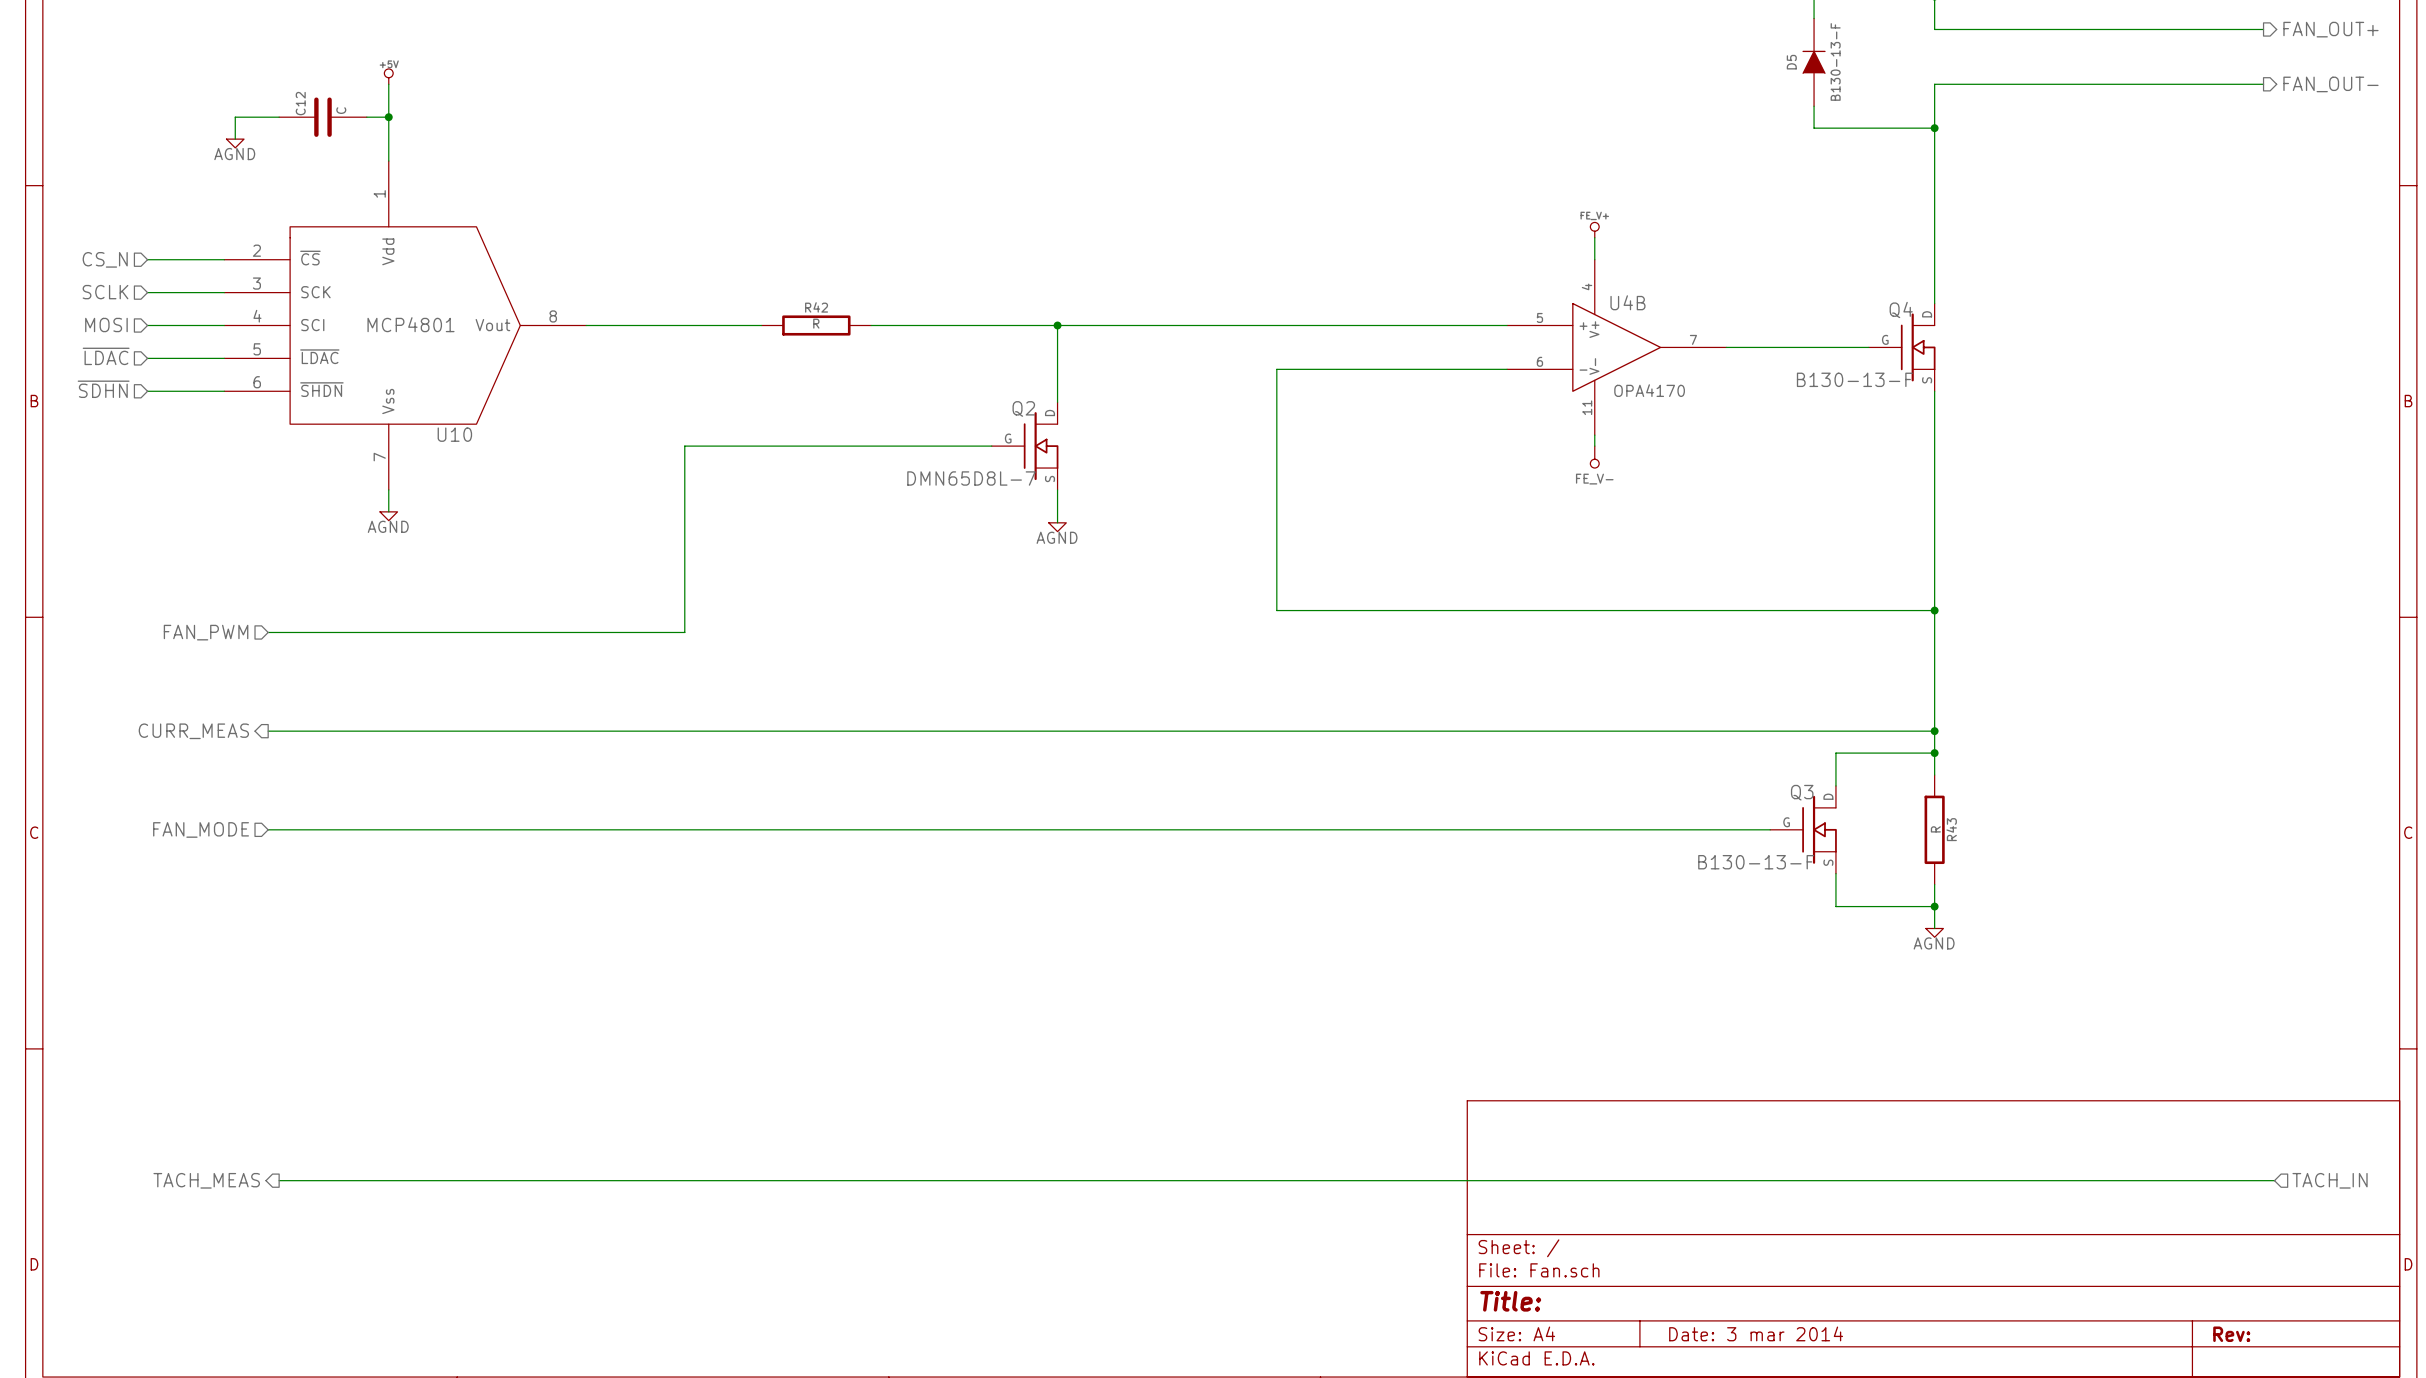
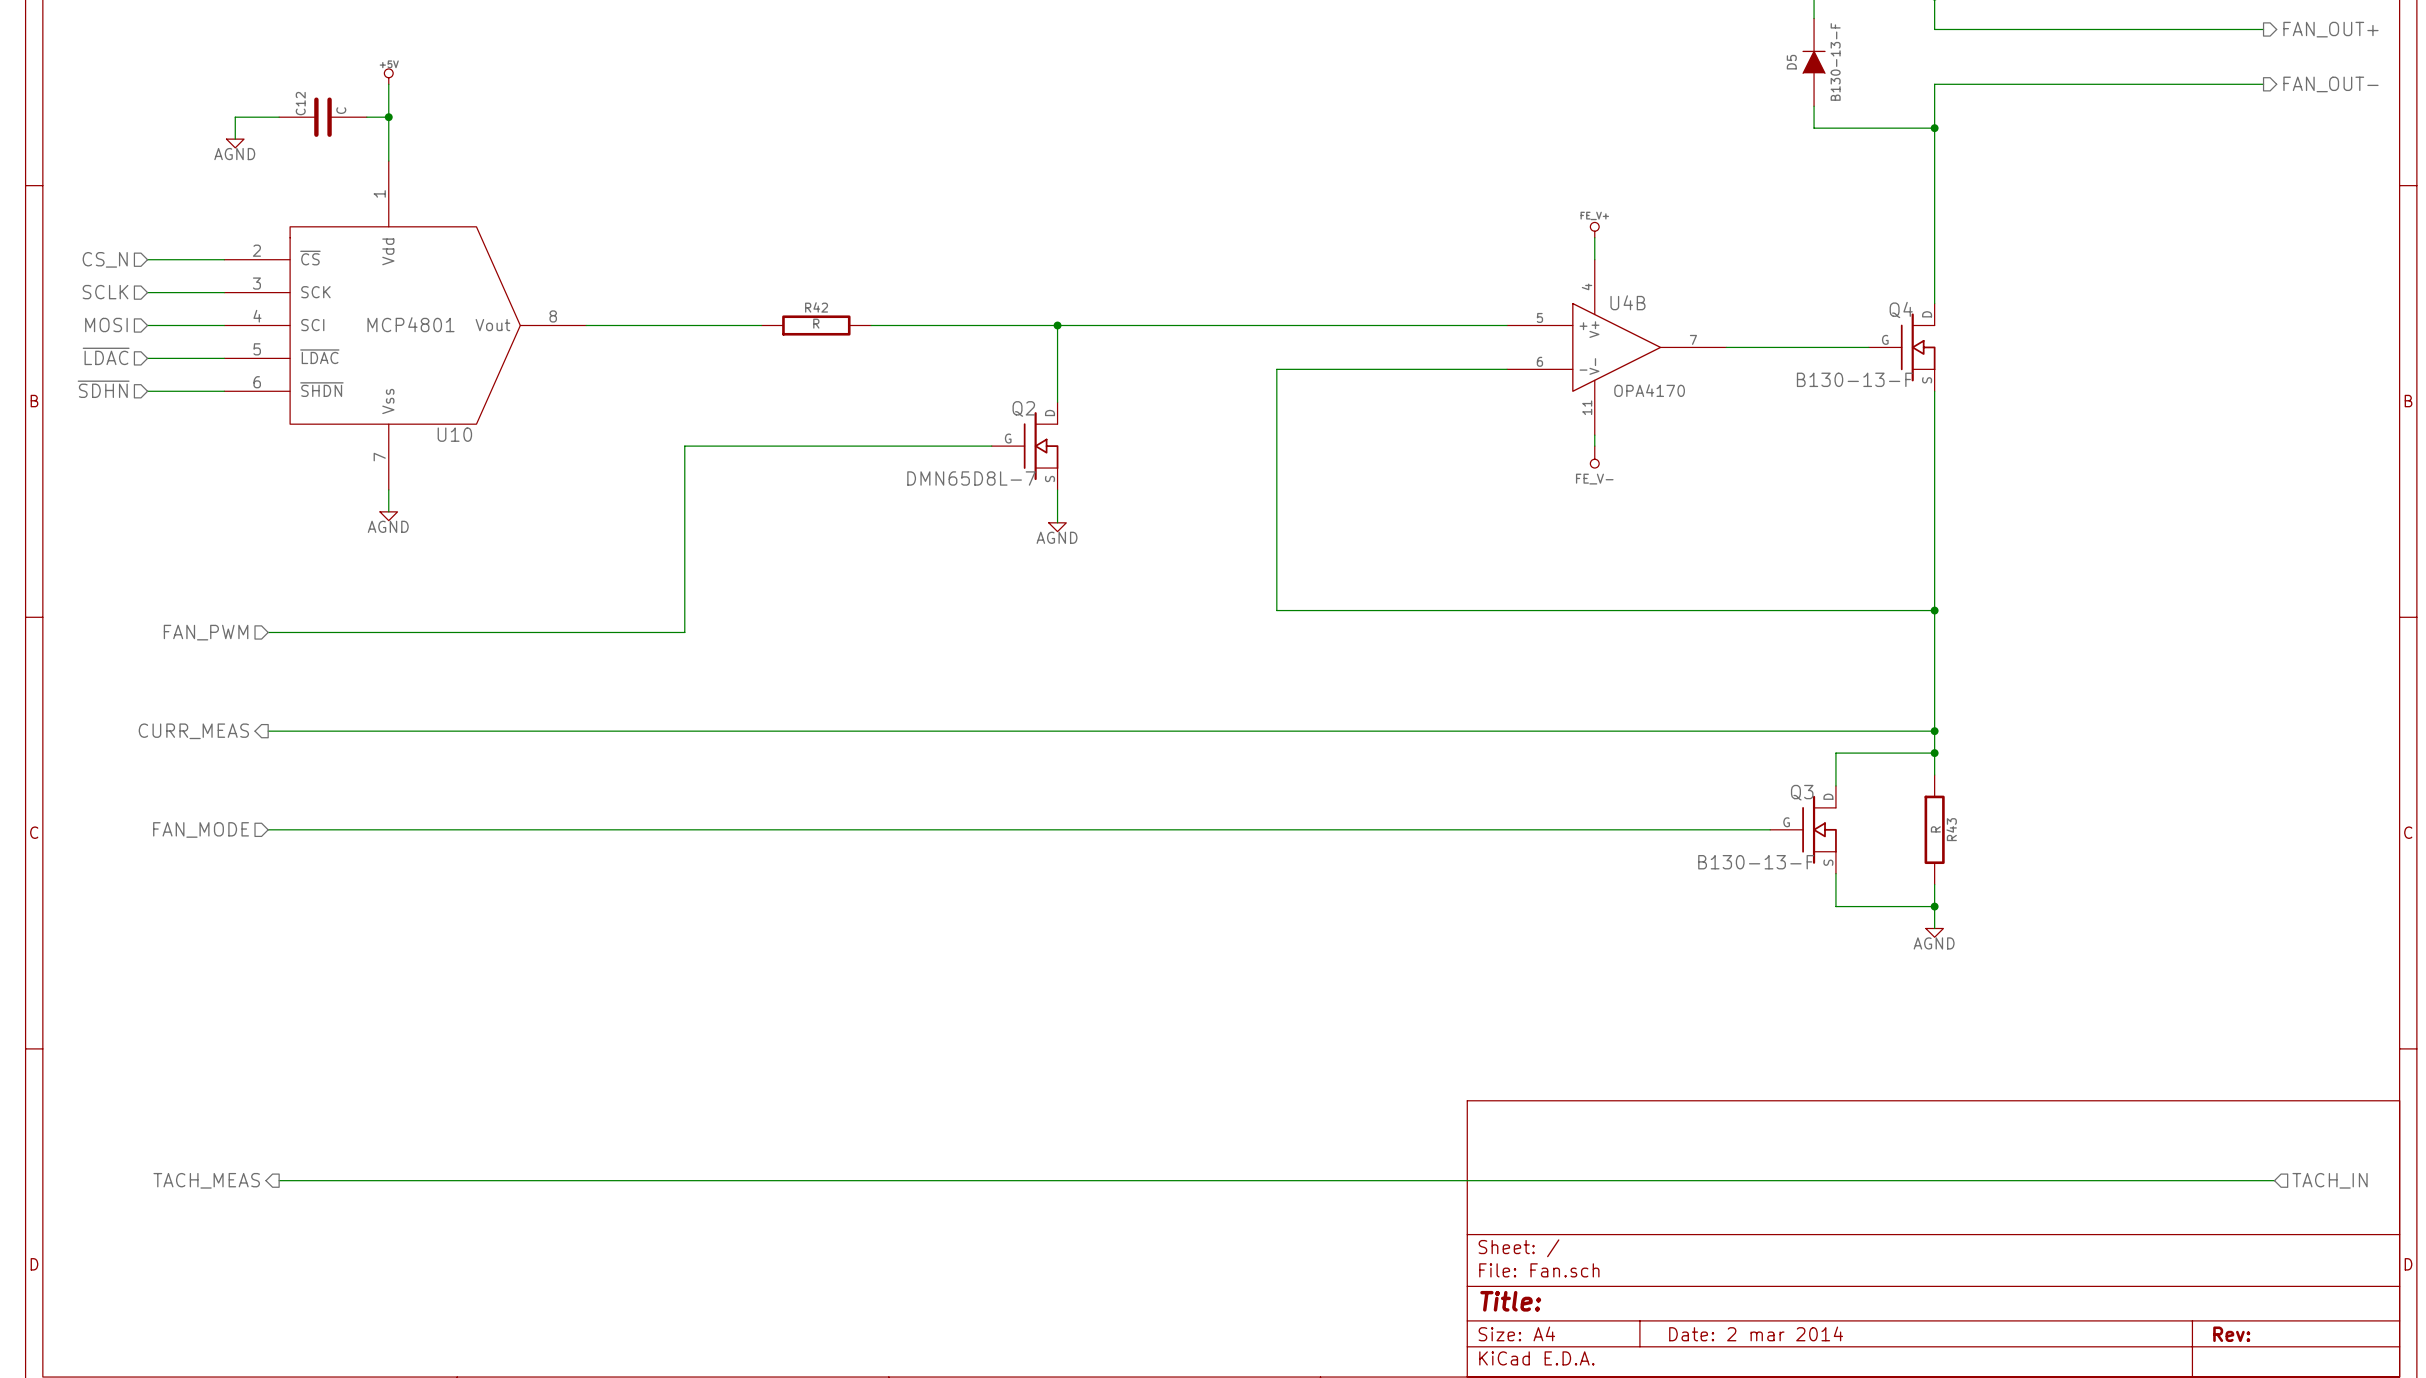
title block: Date: 3 mar 2014 (1756, 1333) -> Date: 2 mar 2014 (1756, 1333)

